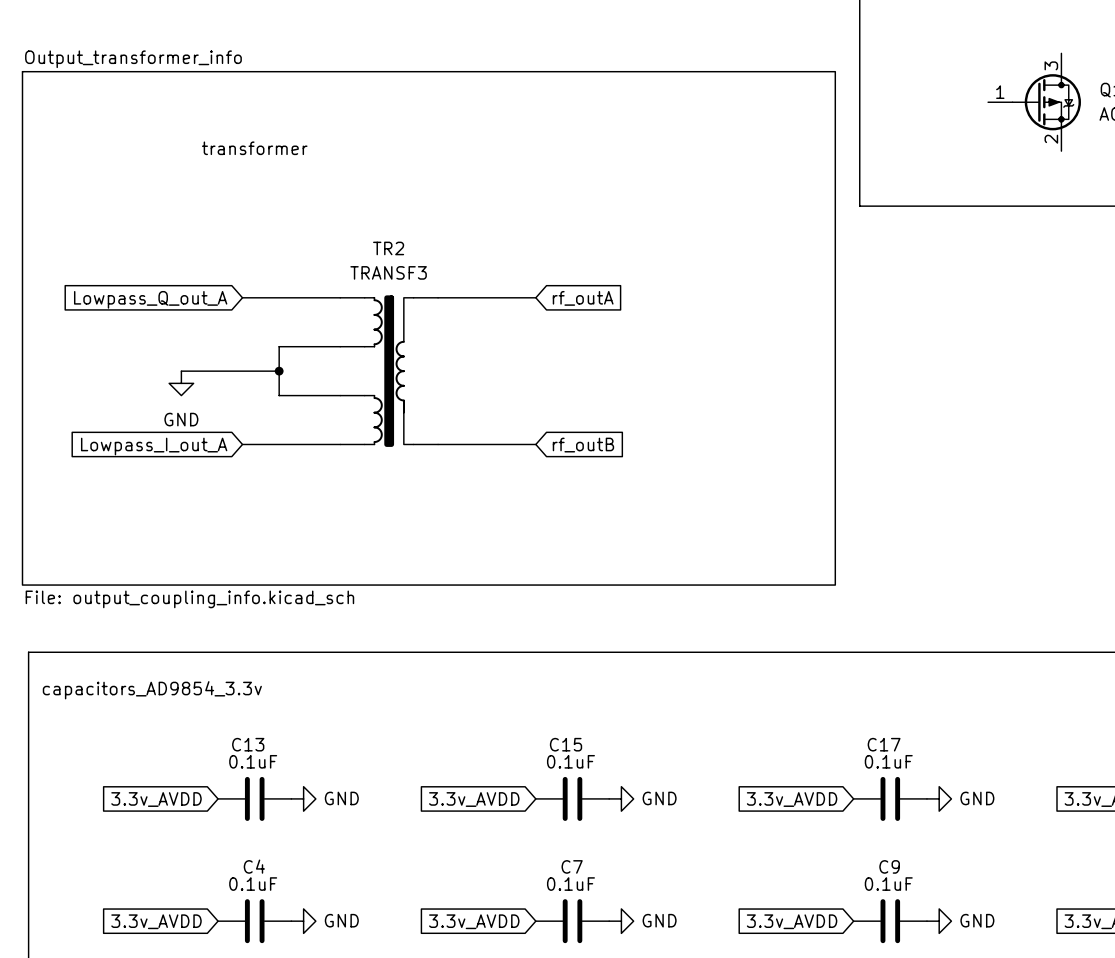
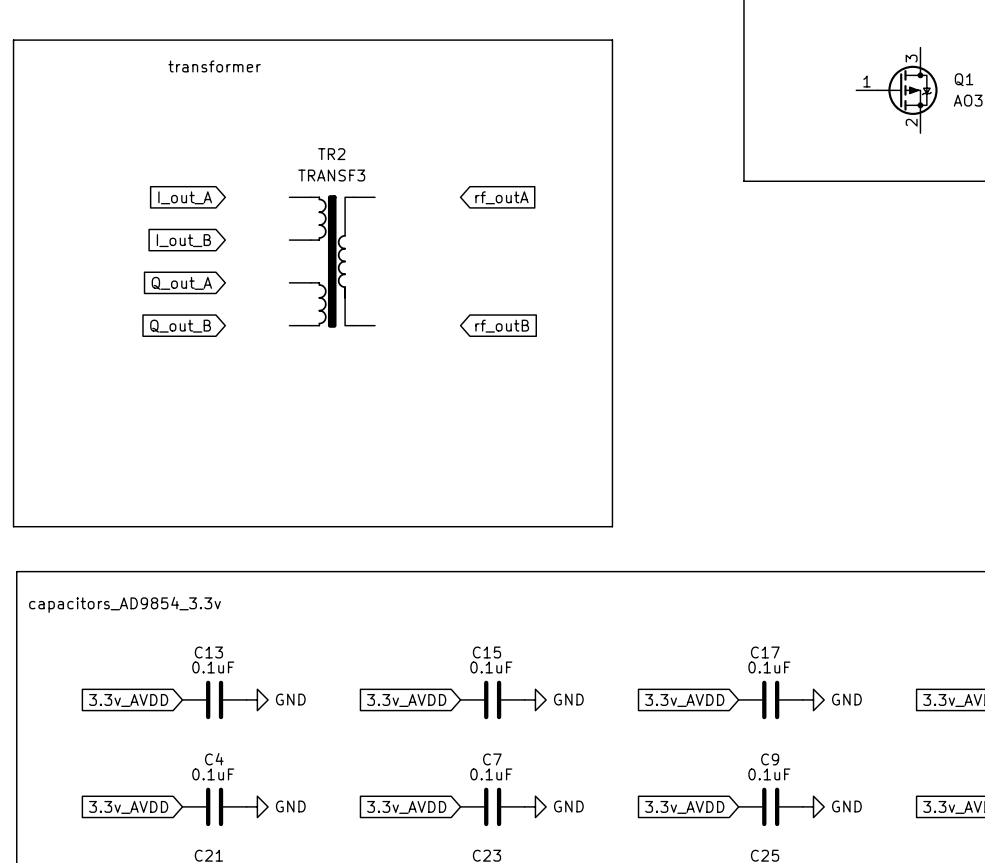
line: none -> (13, 40) (612, 40) (612, 526) (13, 526) (13, 40)
text position: transformer (254, 148) -> transformer (214, 66)
global label: none -> I_out_A (185, 197)
global label: none -> I_out_B (183, 240)
wire: (242, 297) (340, 297) -> none
wire: (438, 297) (535, 297) -> none
global label position: rf_outA (583, 298) -> rf_outA (501, 197)
global label: Lowpass_Q_out_A (150, 299) -> Q_out_A (181, 283)
sheet Output_transformer_info: File: output_coupling_info.kicad_sch (428, 328) -> none
wire: (340, 346) (279, 346) (279, 395) (340, 395) -> none
wire: (181, 371) (279, 371) -> none
global label: none -> Q_out_B (180, 326)
junction: (279, 371) -> none
TR2 position: (389, 371) -> (332, 261)
power symbol: GND (181, 383) -> none
wire: (242, 444) (340, 444) -> none
wire: (438, 444) (535, 444) -> none
global label position: rf_outB (583, 445) -> rf_outB (502, 326)
global label: Lowpass_I_out_A (154, 446) -> none

